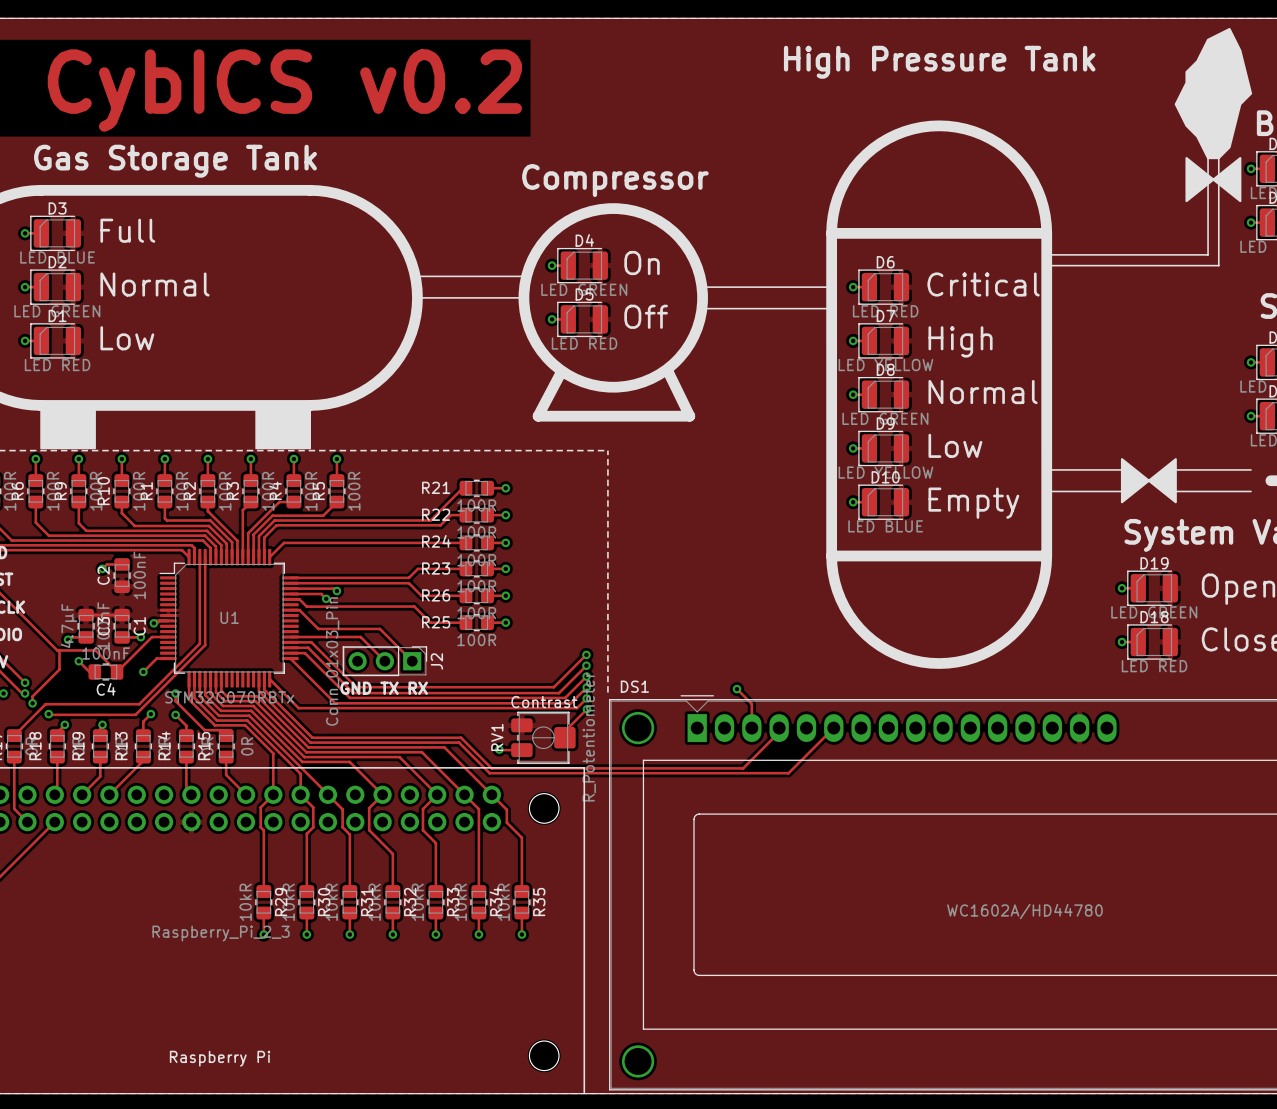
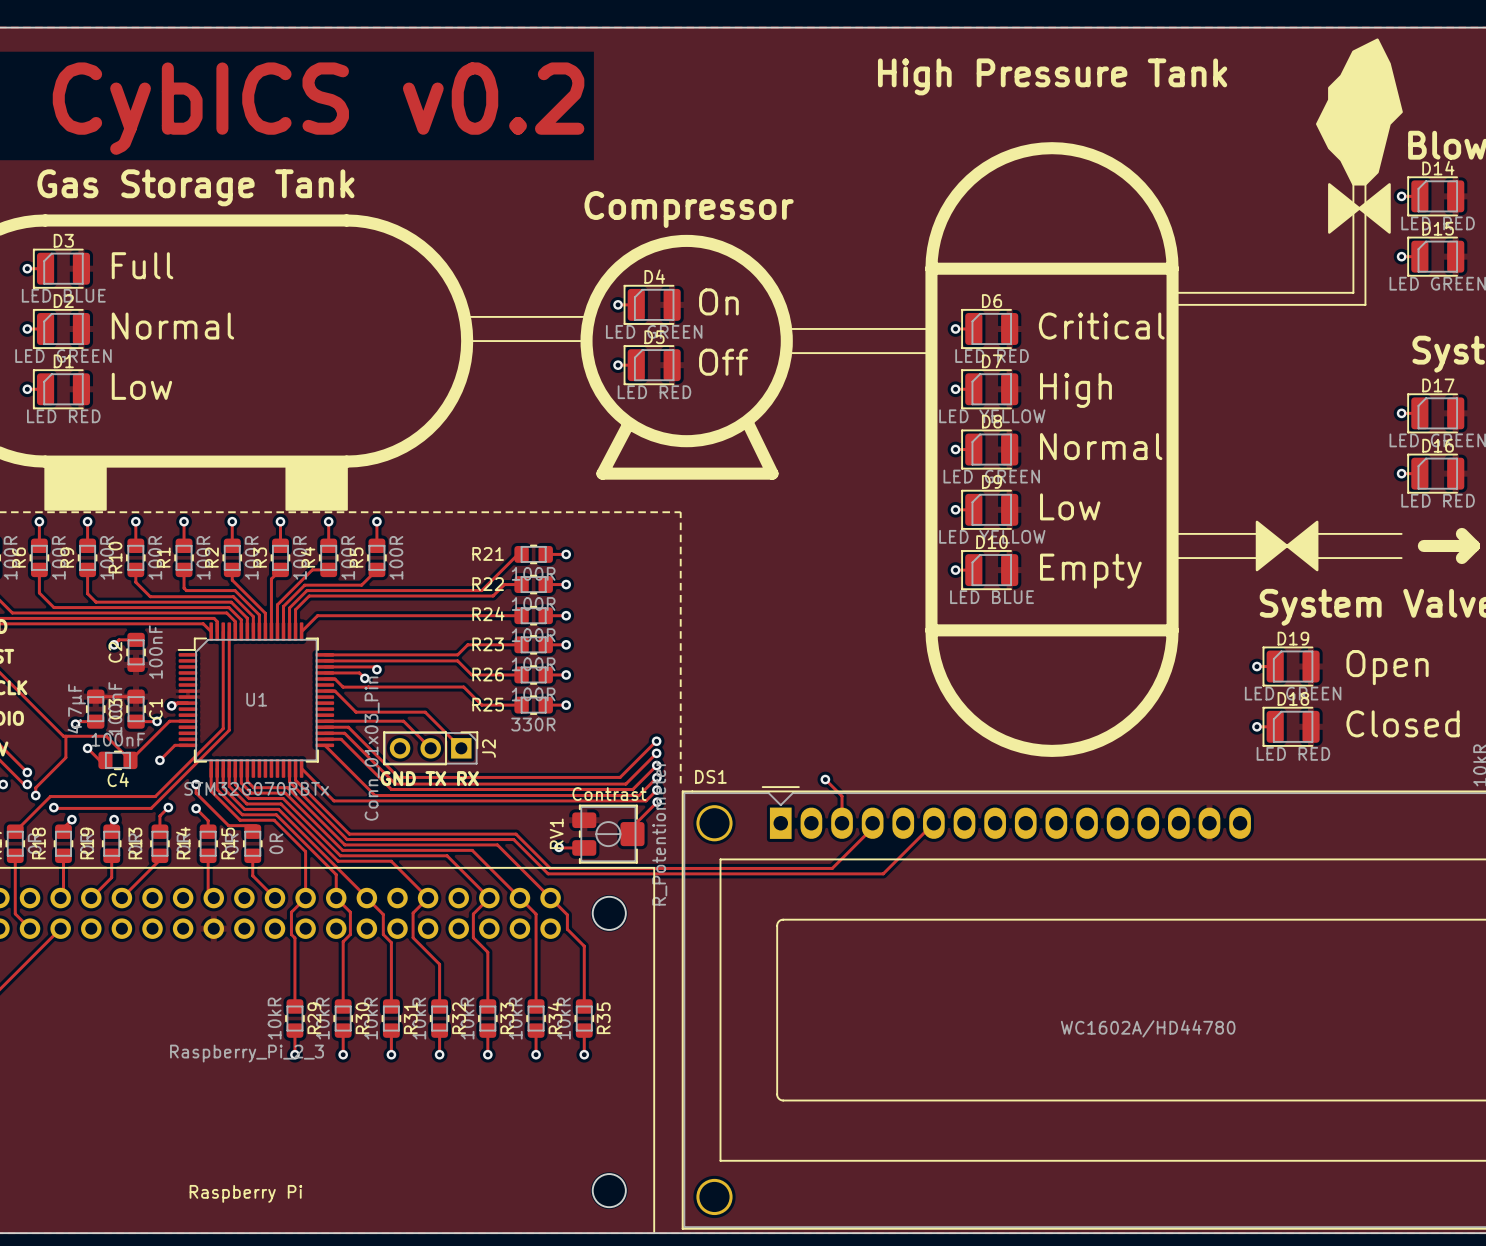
R25 value: 100R (476, 640) -> 330R (533, 724)

